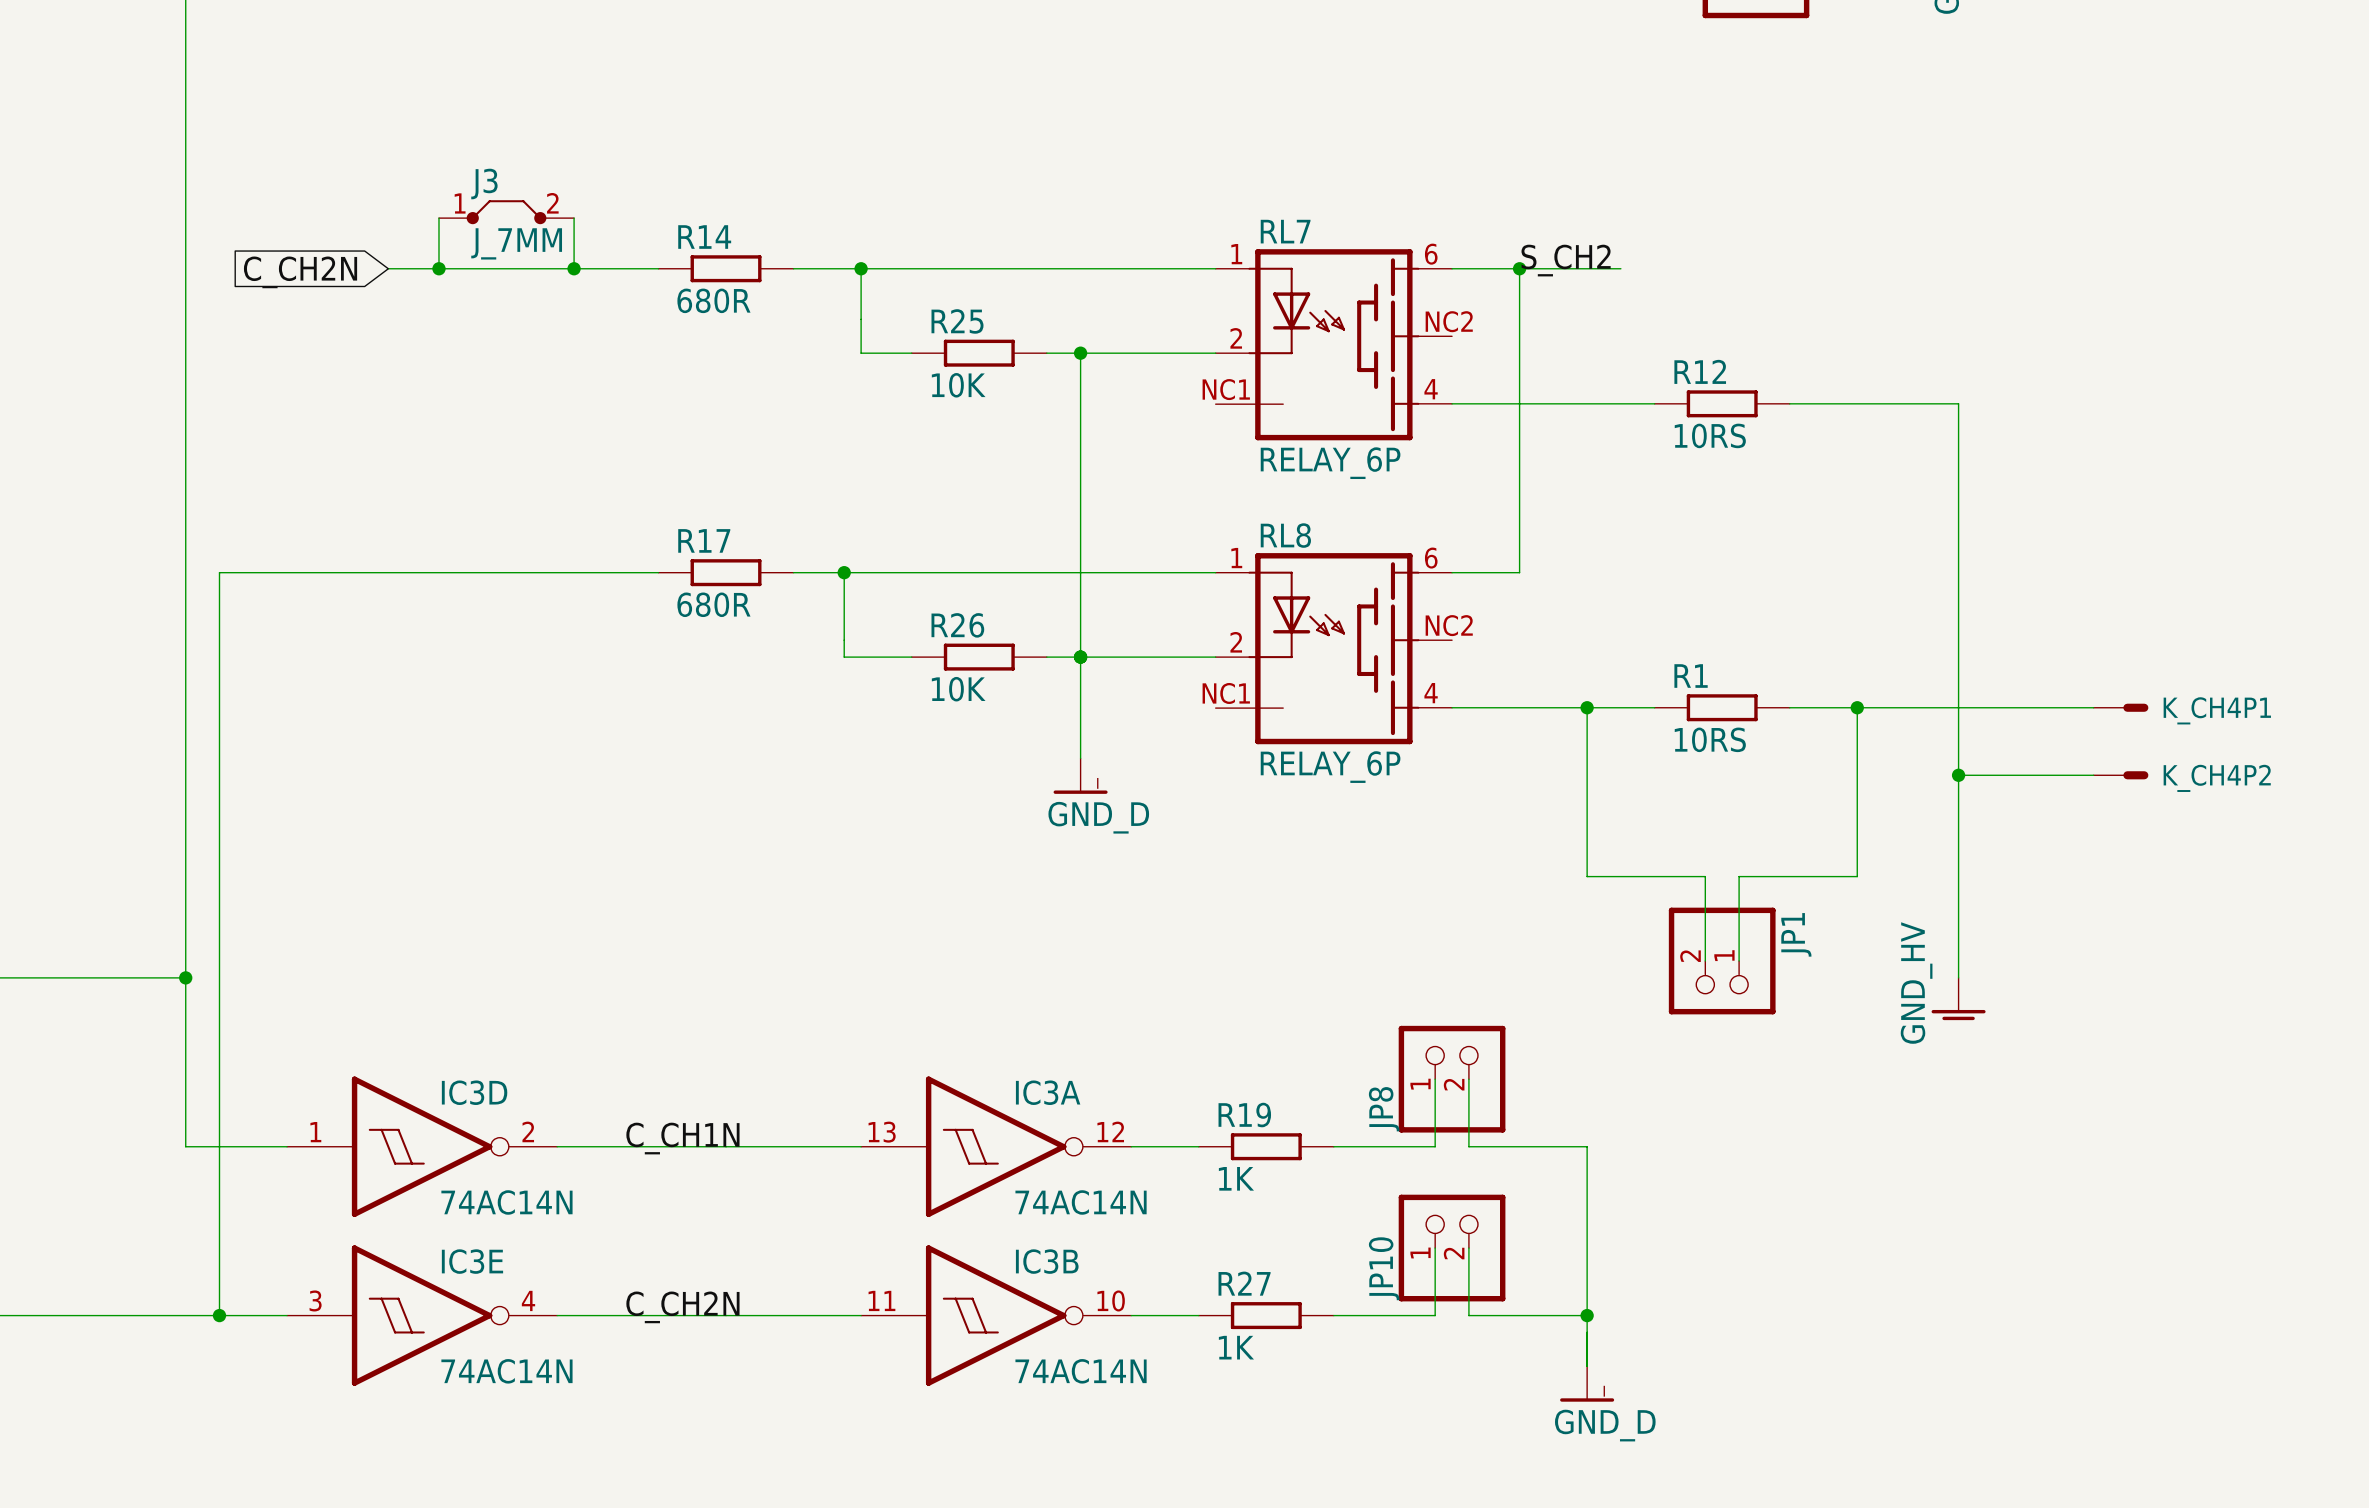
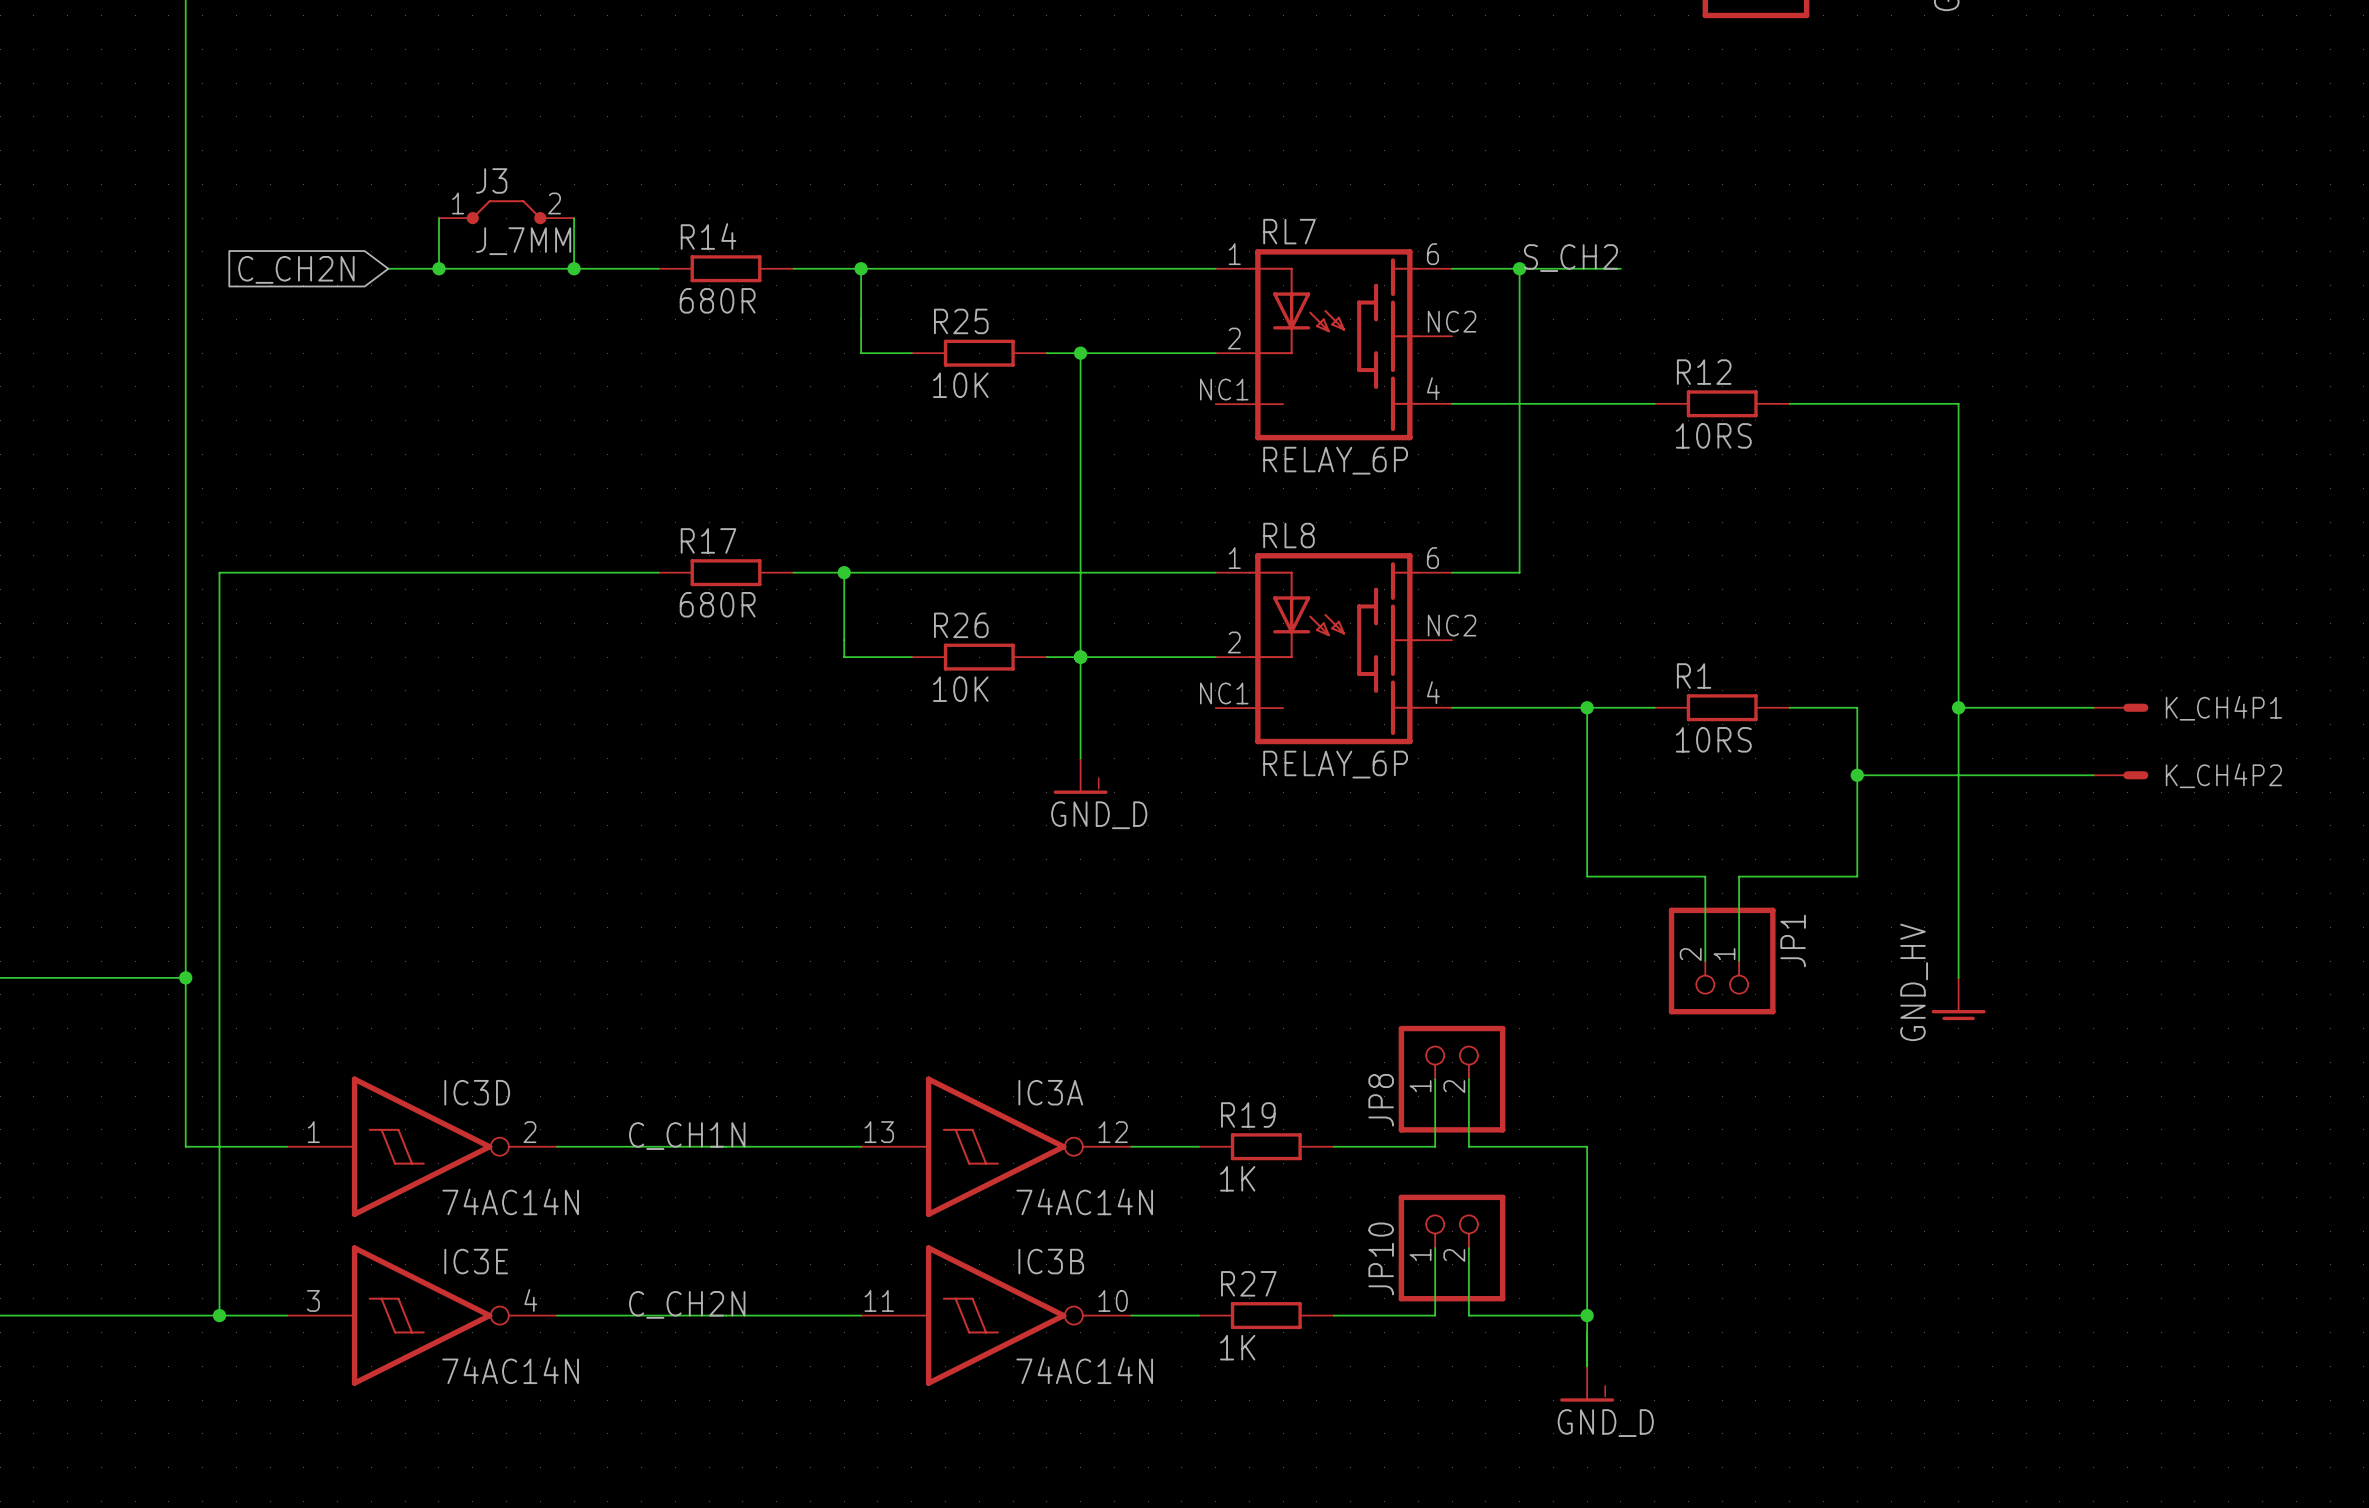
wire: (1857, 707) (1958, 707) -> (1857, 775) (1958, 775)
junction: (1857, 707) -> none
junction: none -> (1958, 707)
junction: none -> (1857, 775)
junction: (1958, 775) -> none

